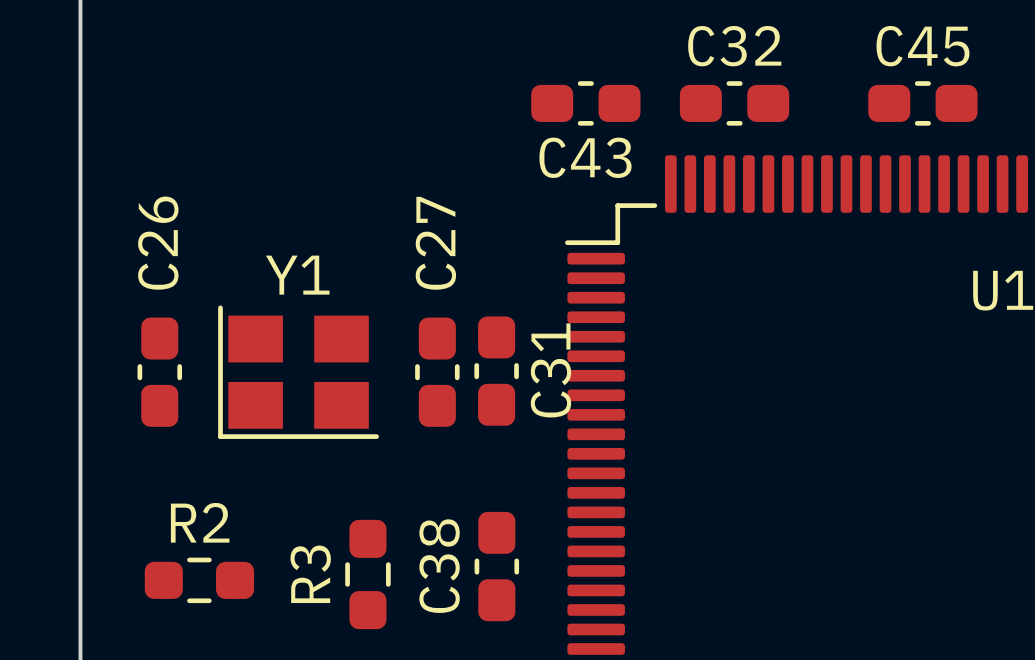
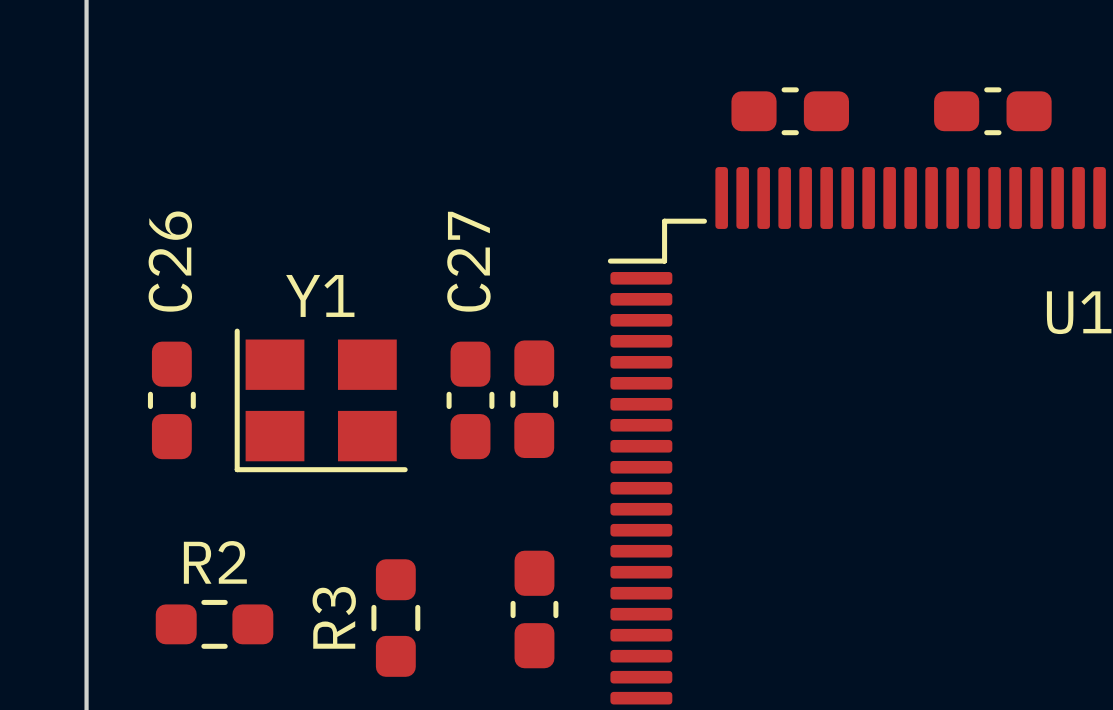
C32 name: C32 (734, 46) -> none
C45 name: C45 (922, 46) -> none
C43: (585, 103) -> none
C31 name: C31 (550, 370) -> none
C38 name: C38 (439, 566) -> none

